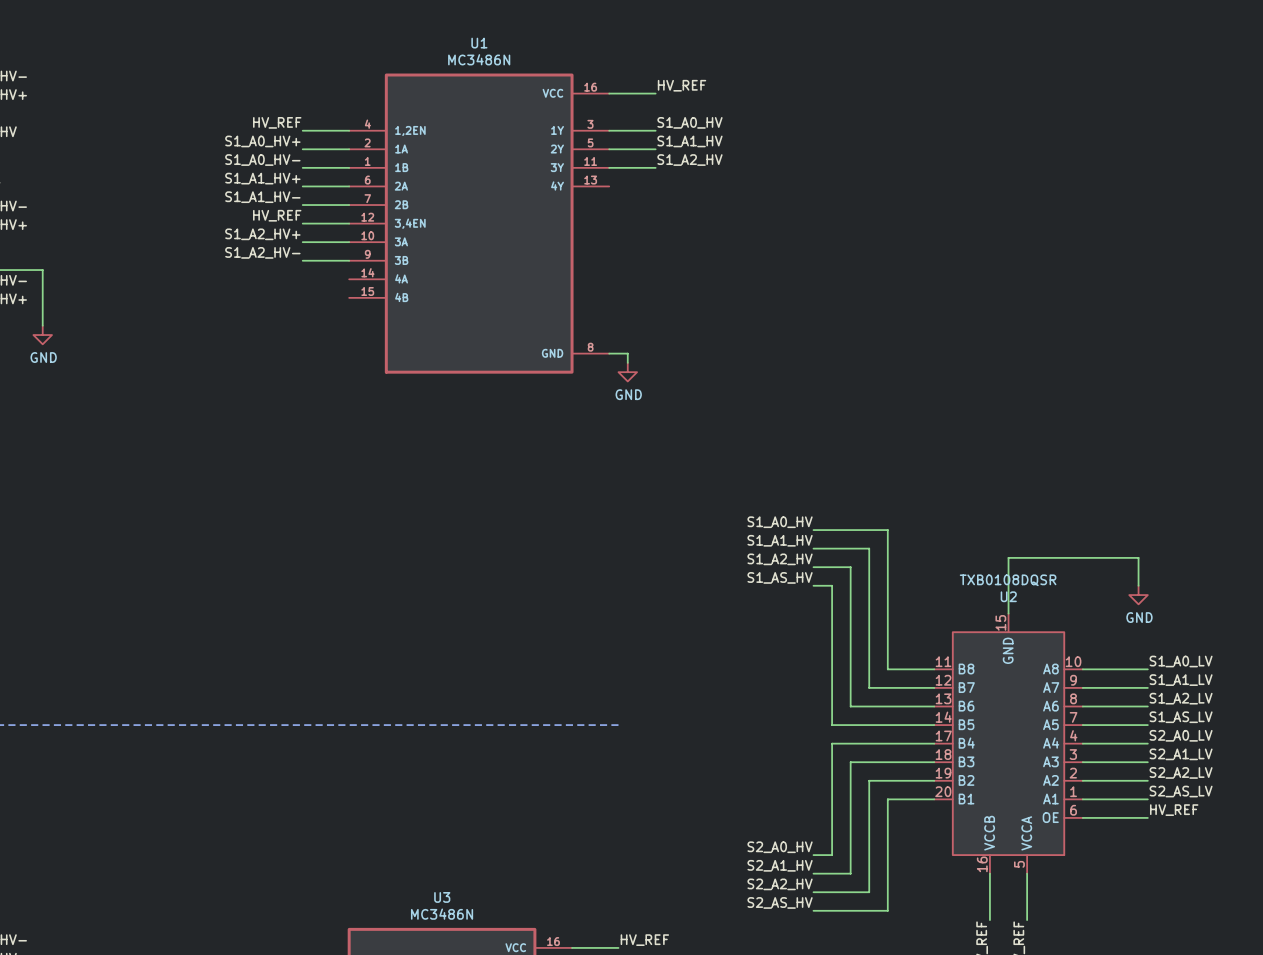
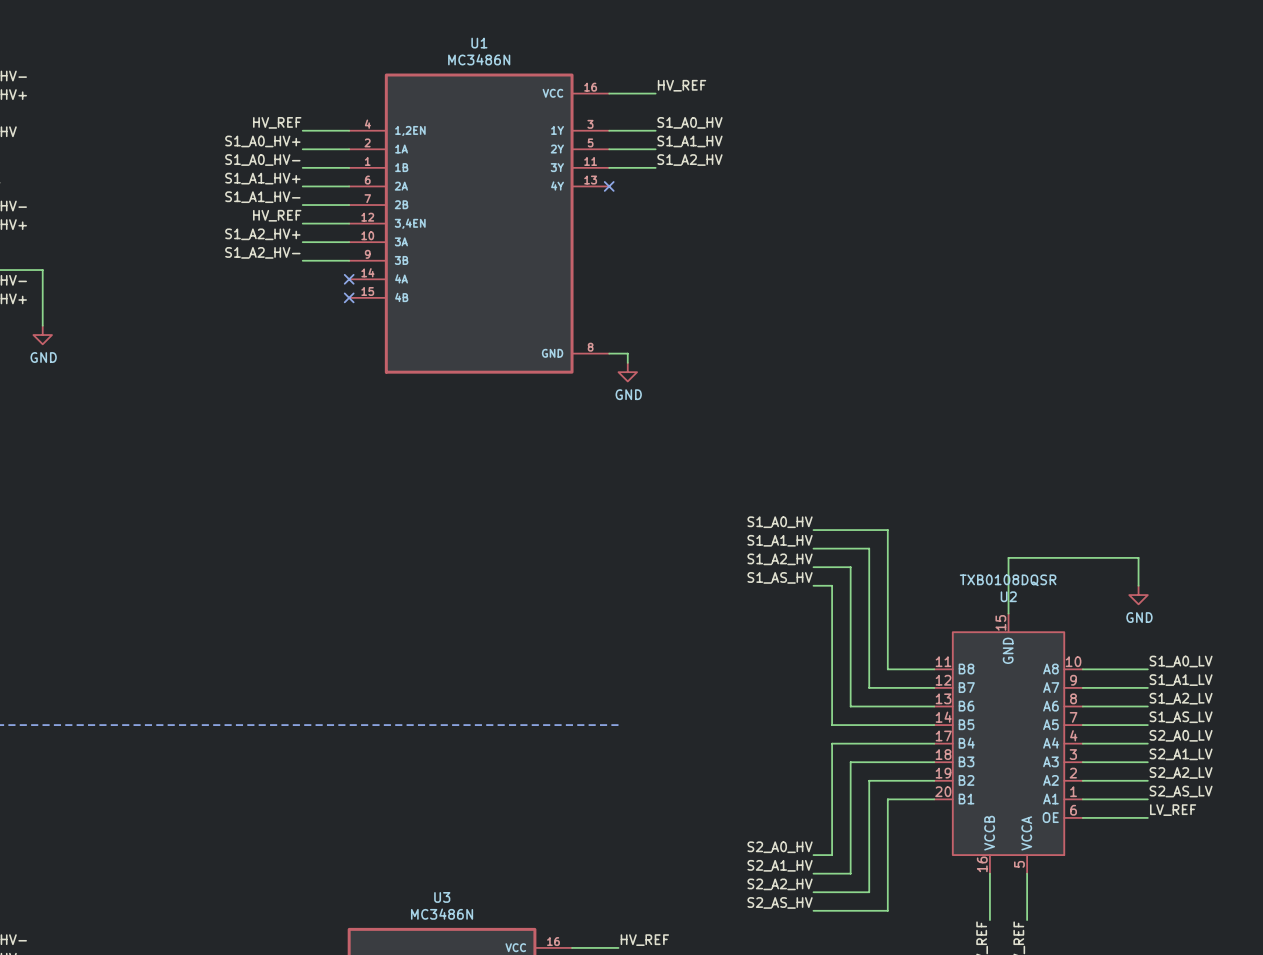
no-connect mark: none -> (609, 186)
no-connect mark: none -> (349, 279)
no-connect mark: none -> (349, 297)
label: HV_REF (1174, 810) -> LV_REF (1173, 810)

